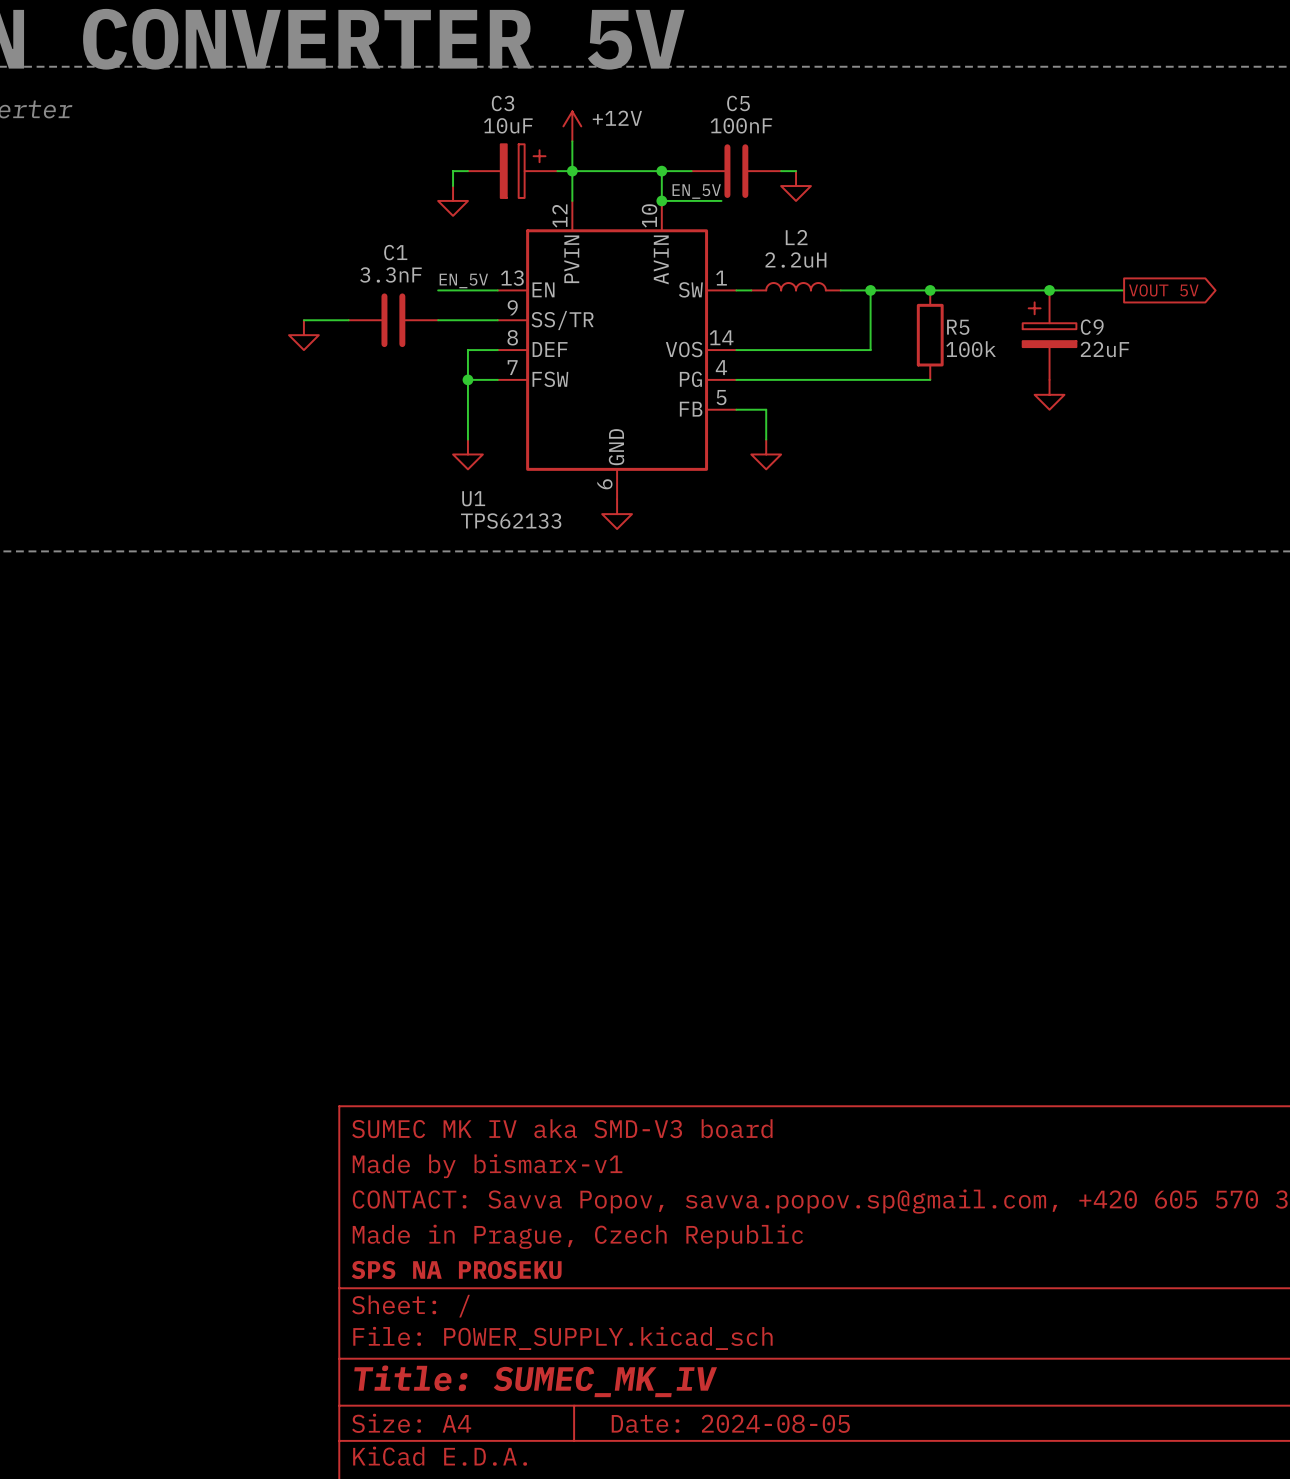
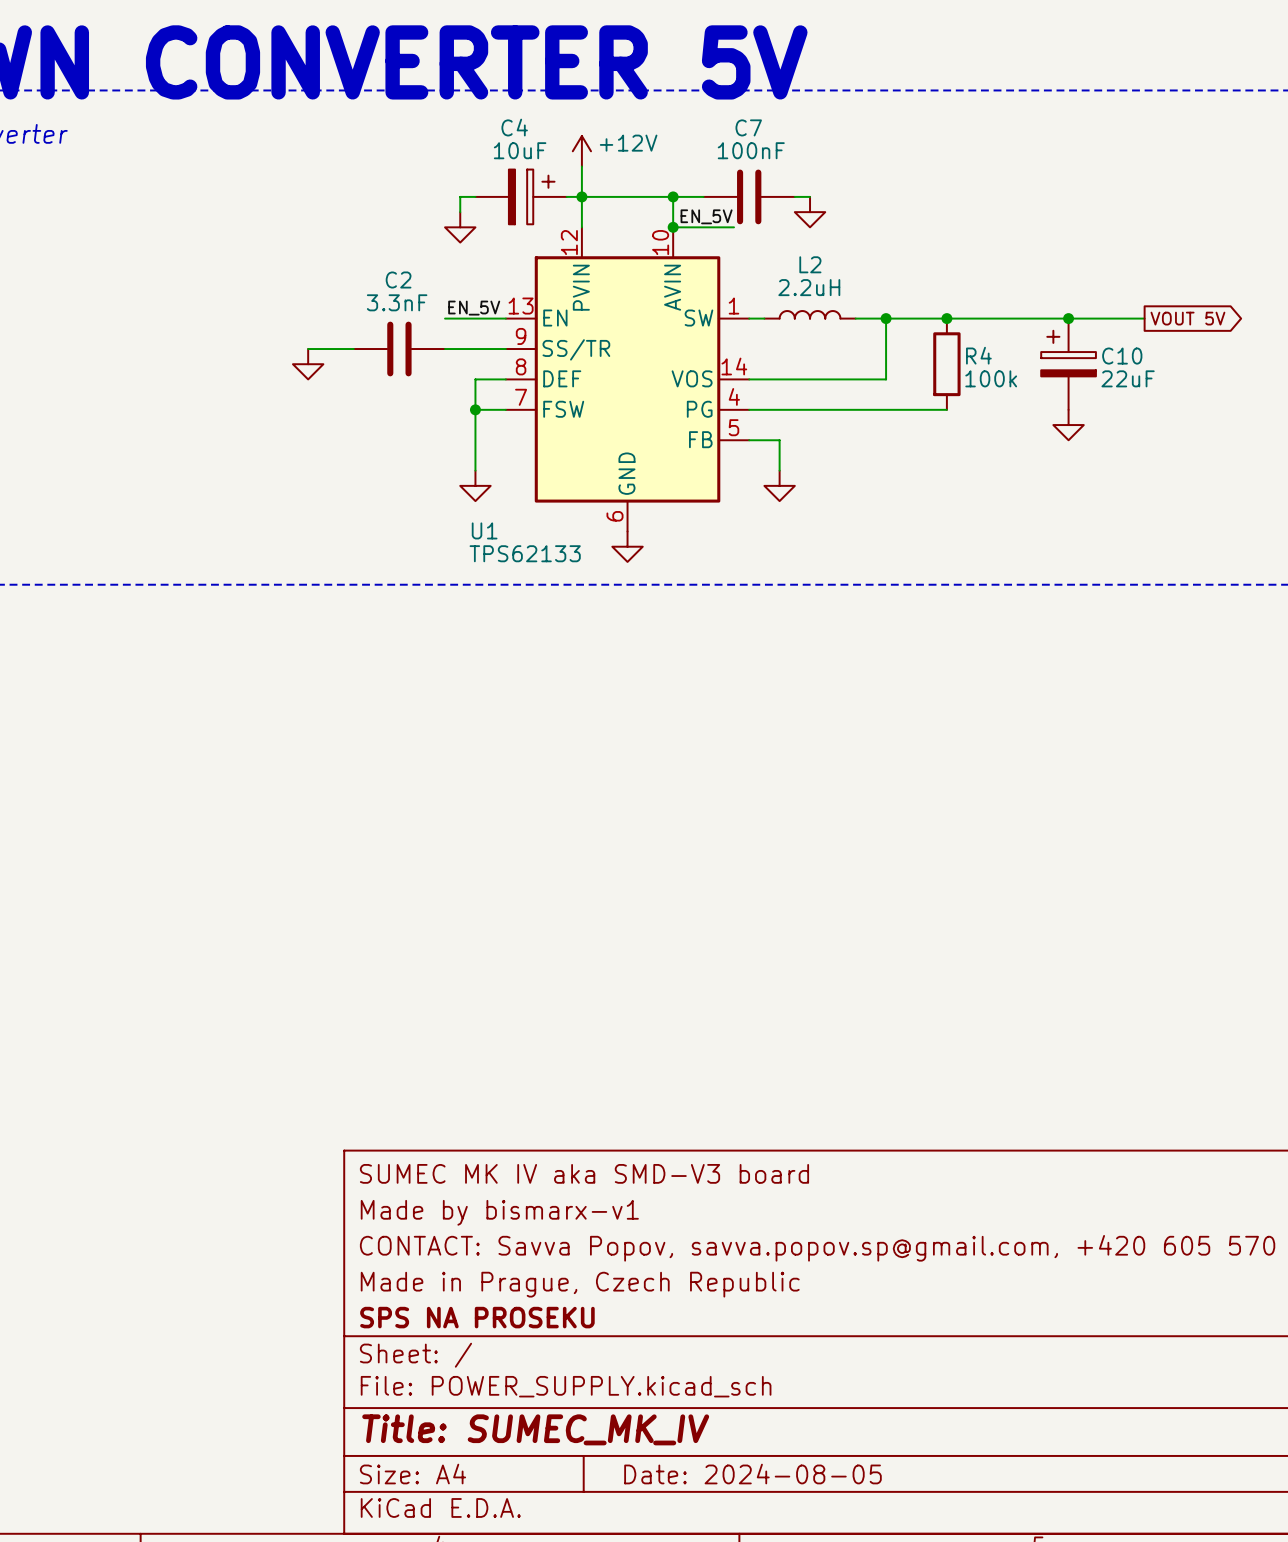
C3 name: C3 (503, 103) -> C4 (514, 127)
C5 name: C5 (738, 103) -> C7 (748, 127)
C1 name: C1 (395, 252) -> C2 (398, 280)
R5 name: R5 (958, 327) -> R4 (978, 355)
C9 name: C9 (1092, 327) -> C10 (1122, 356)

